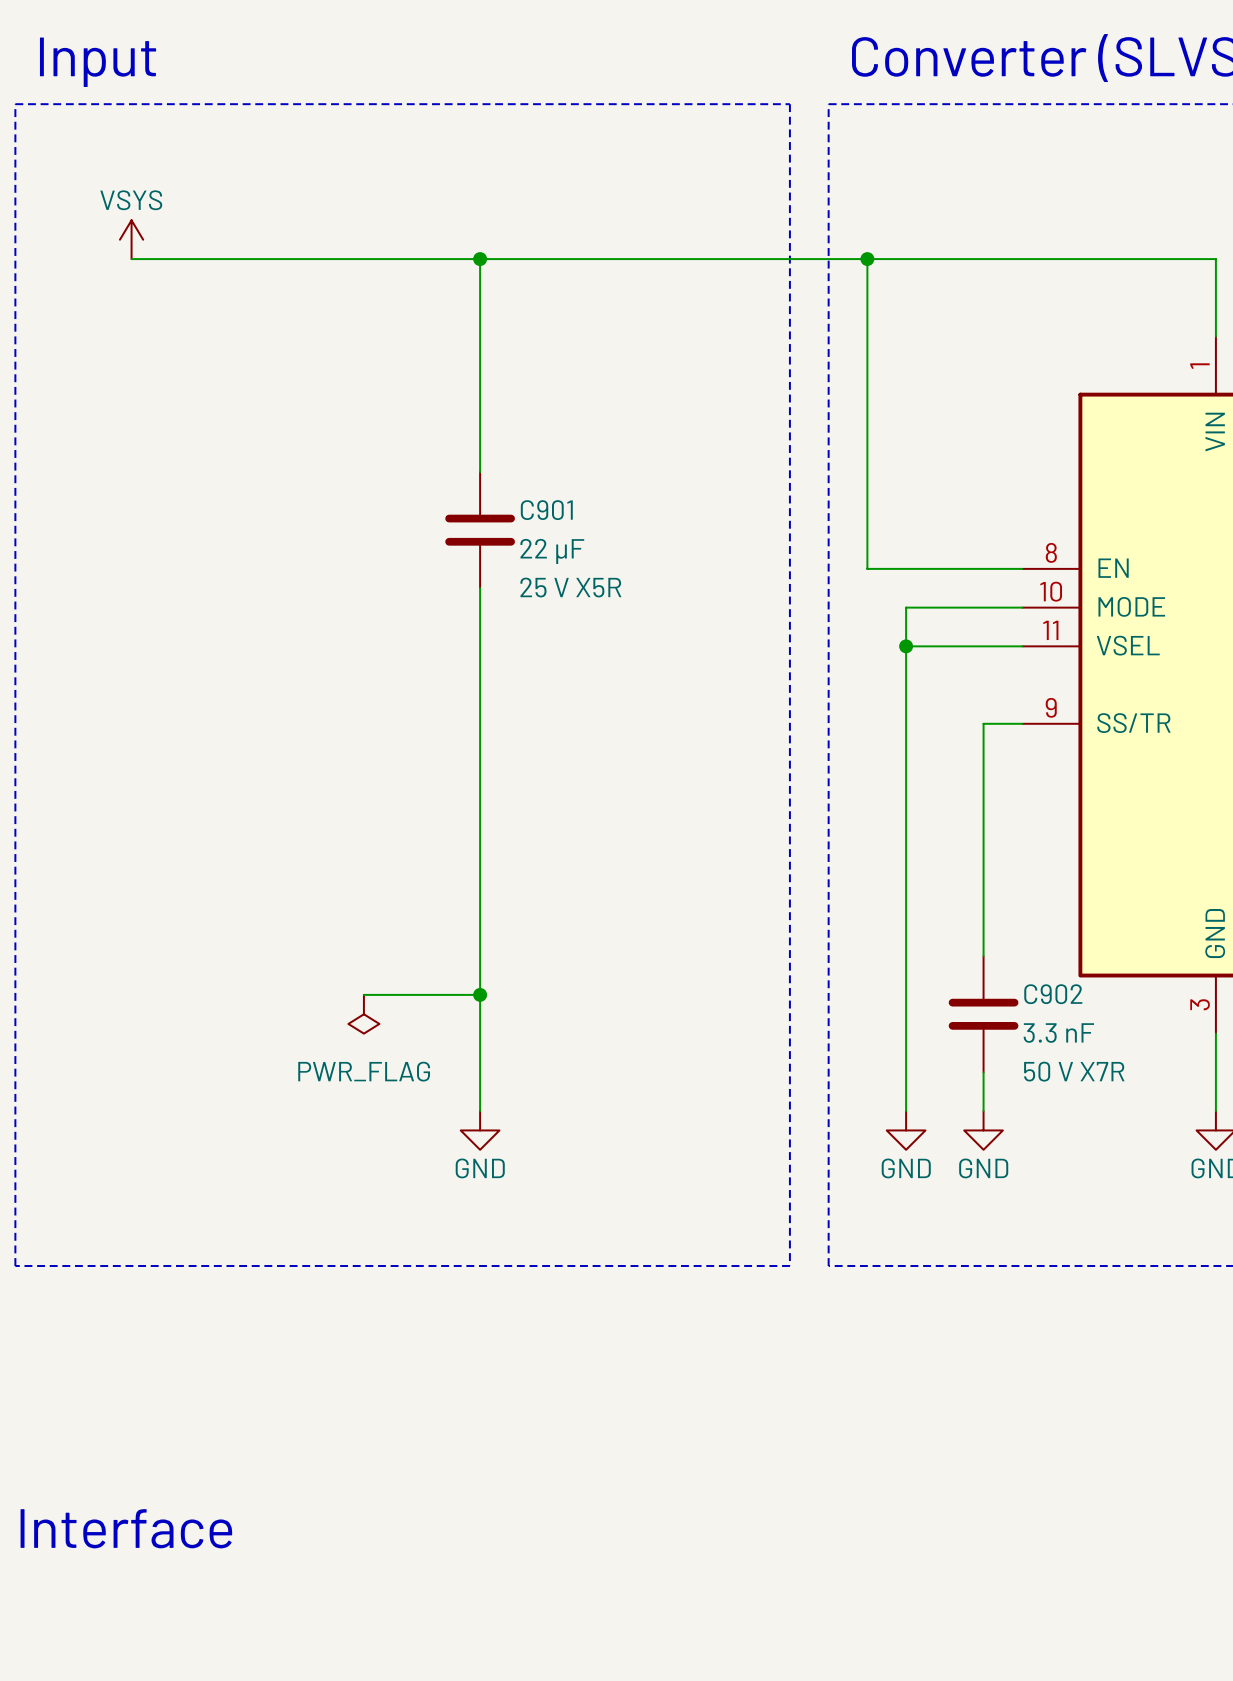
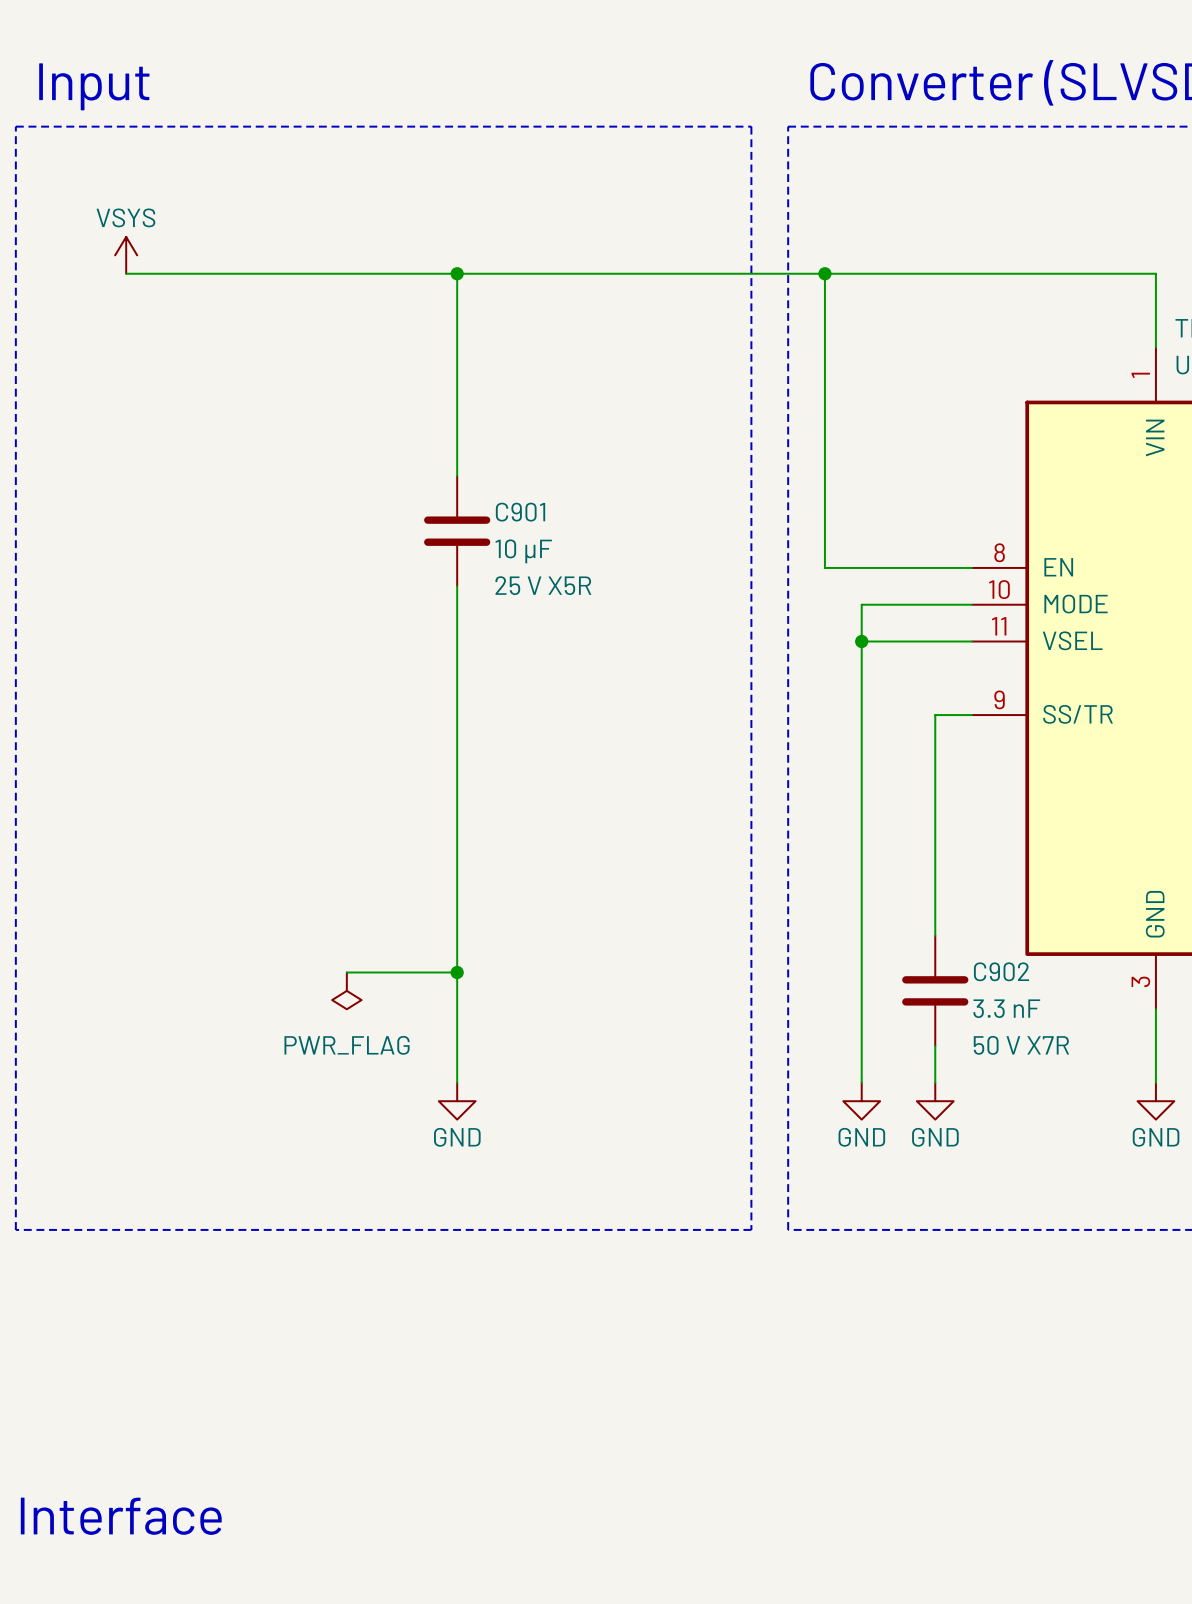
C901 value: 22 µF (552, 551) -> 10 µF (523, 551)
text position: Interface (126, 1528) -> Interface (121, 1516)

